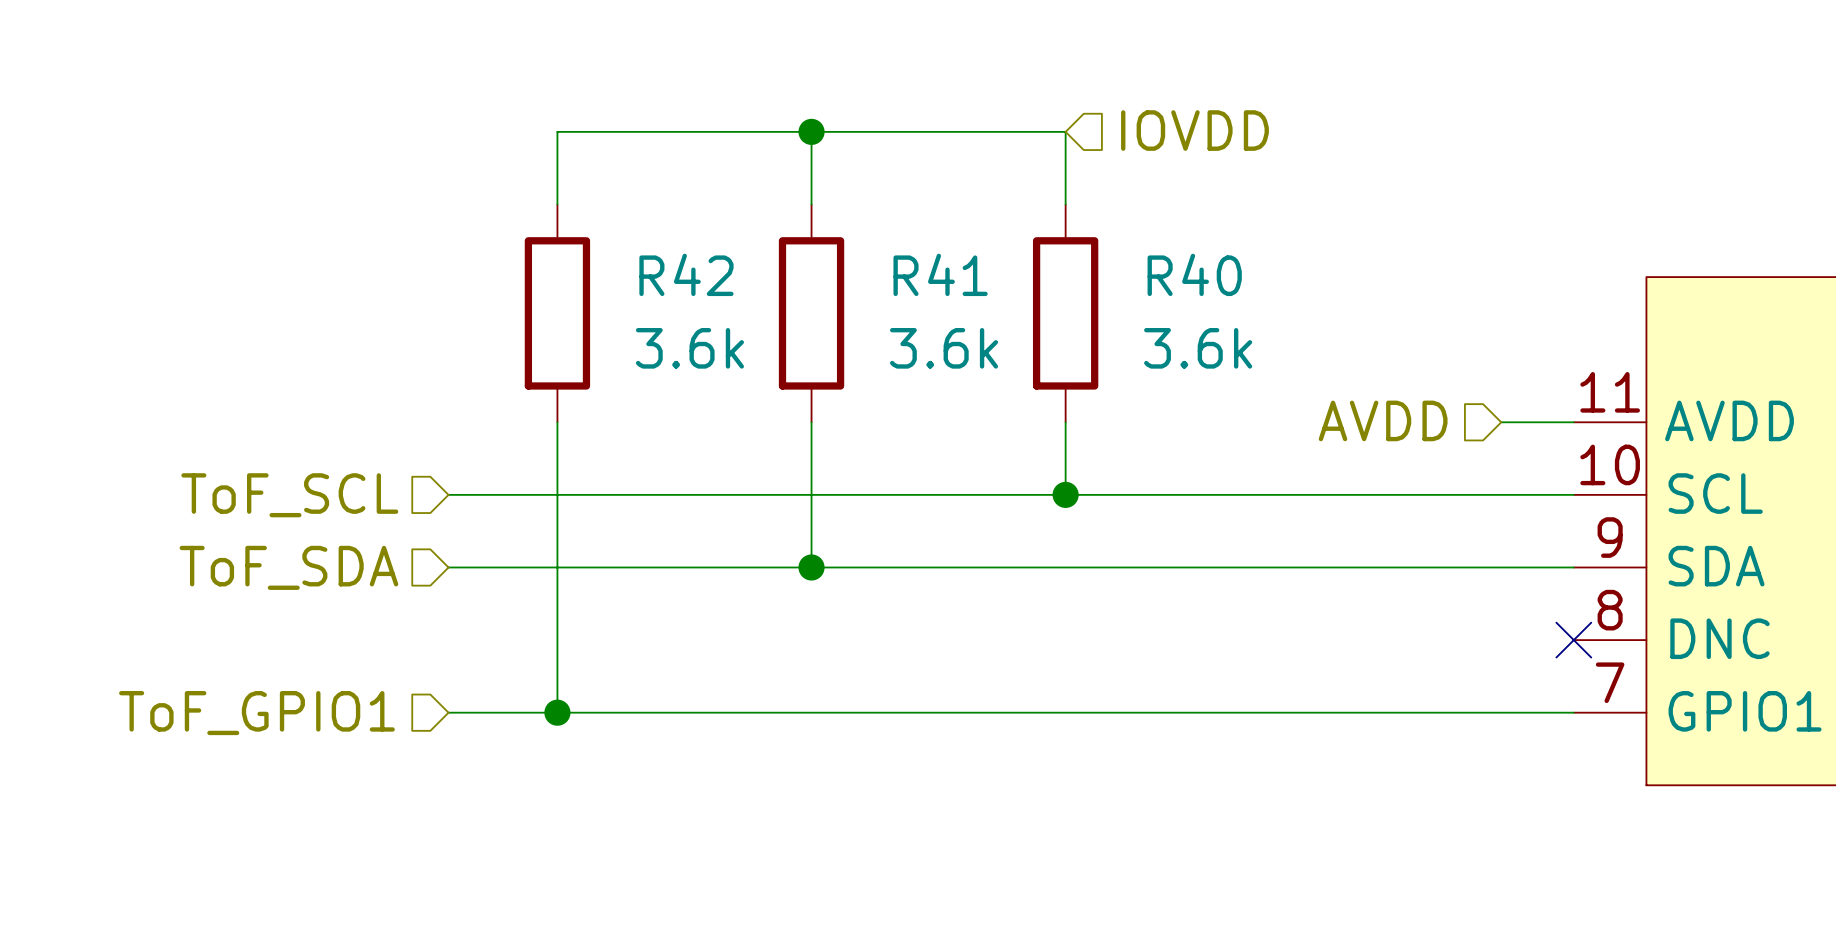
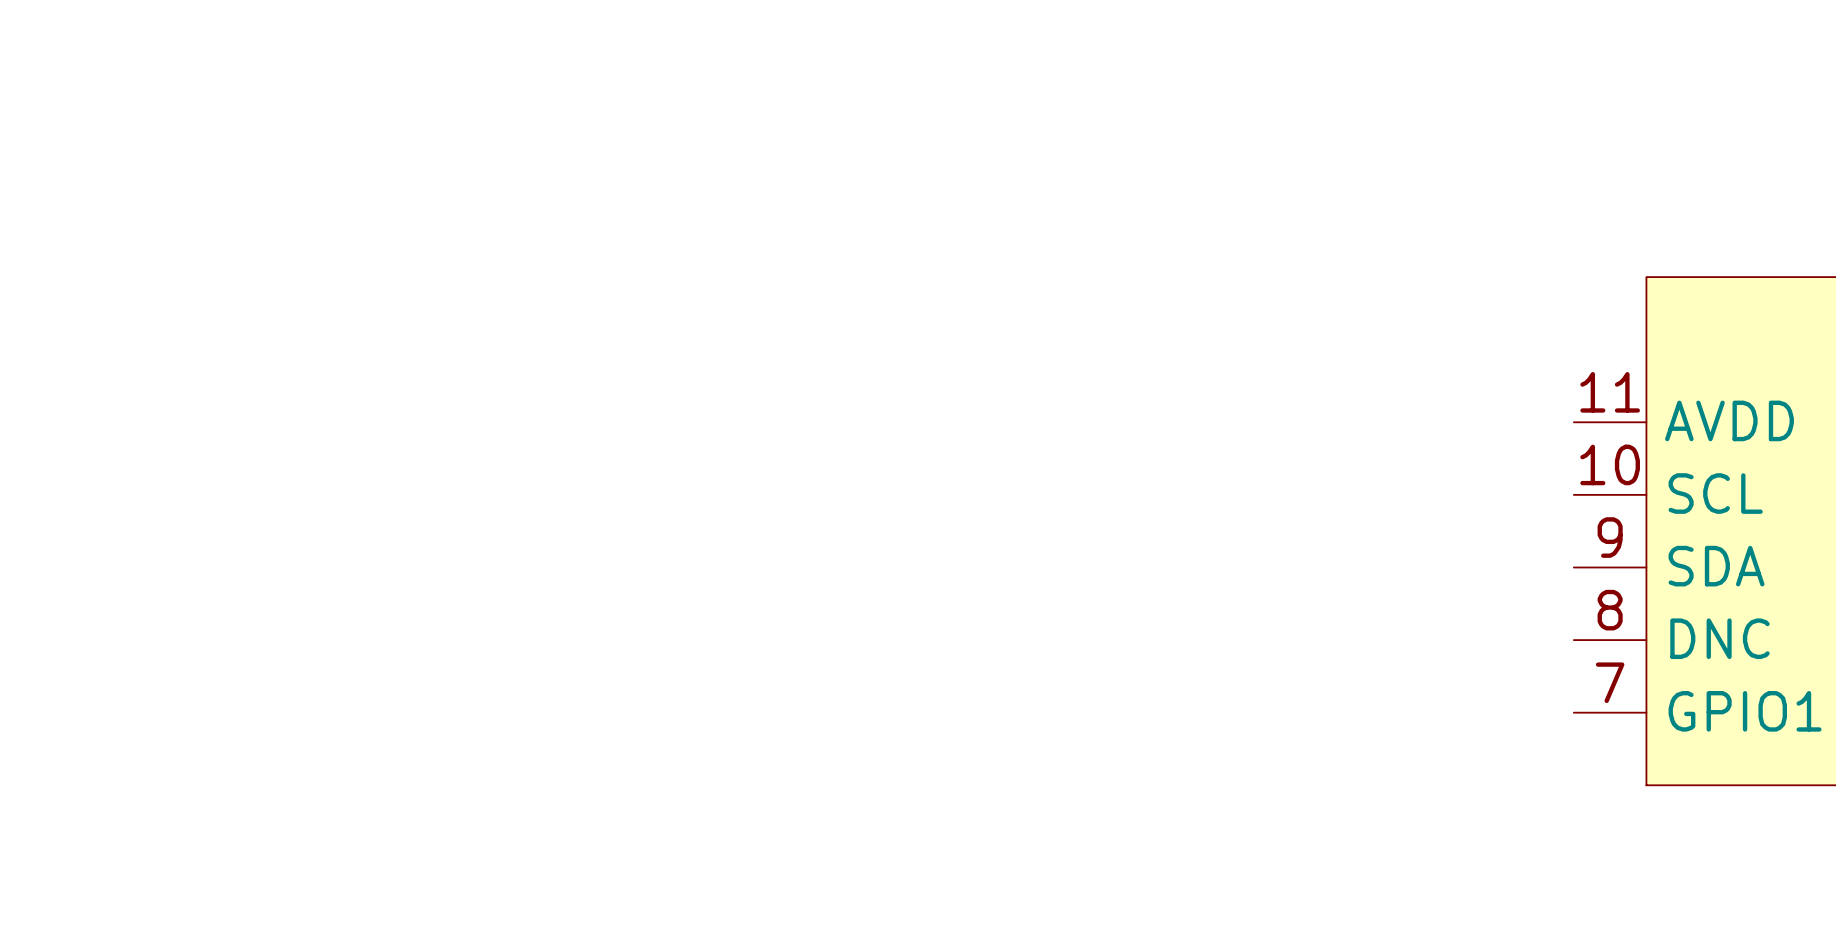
hierarchical label: IOVDD (1194, 130) -> none
wire: (811, 131) (811, 204) -> none
junction: (811, 131) -> none
wire: (557, 204) (557, 131) (1065, 131) (1065, 204) -> none
R42: 3.6k (557, 313) -> none
R41: 3.6k (811, 313) -> none
R40: 3.6k (1065, 313) -> none
hierarchical label: AVDD (1383, 420) -> none
wire: (557, 422) (557, 712) -> none
wire: (811, 422) (811, 567) -> none
wire: (1065, 422) (1065, 494) -> none
wire: (1501, 422) (1573, 422) -> none
wire: (448, 494) (1573, 494) -> none
junction: (1065, 494) -> none
hierarchical label: ToF_SCL (289, 495) -> none
hierarchical label: ToF_SDA (288, 567) -> none
wire: (448, 567) (1573, 567) -> none
junction: (811, 567) -> none
no-connect mark: (1573, 640) -> none
wire: (448, 712) (1573, 712) -> none
junction: (557, 712) -> none
hierarchical label: ToF_GPIO1 (256, 713) -> none

